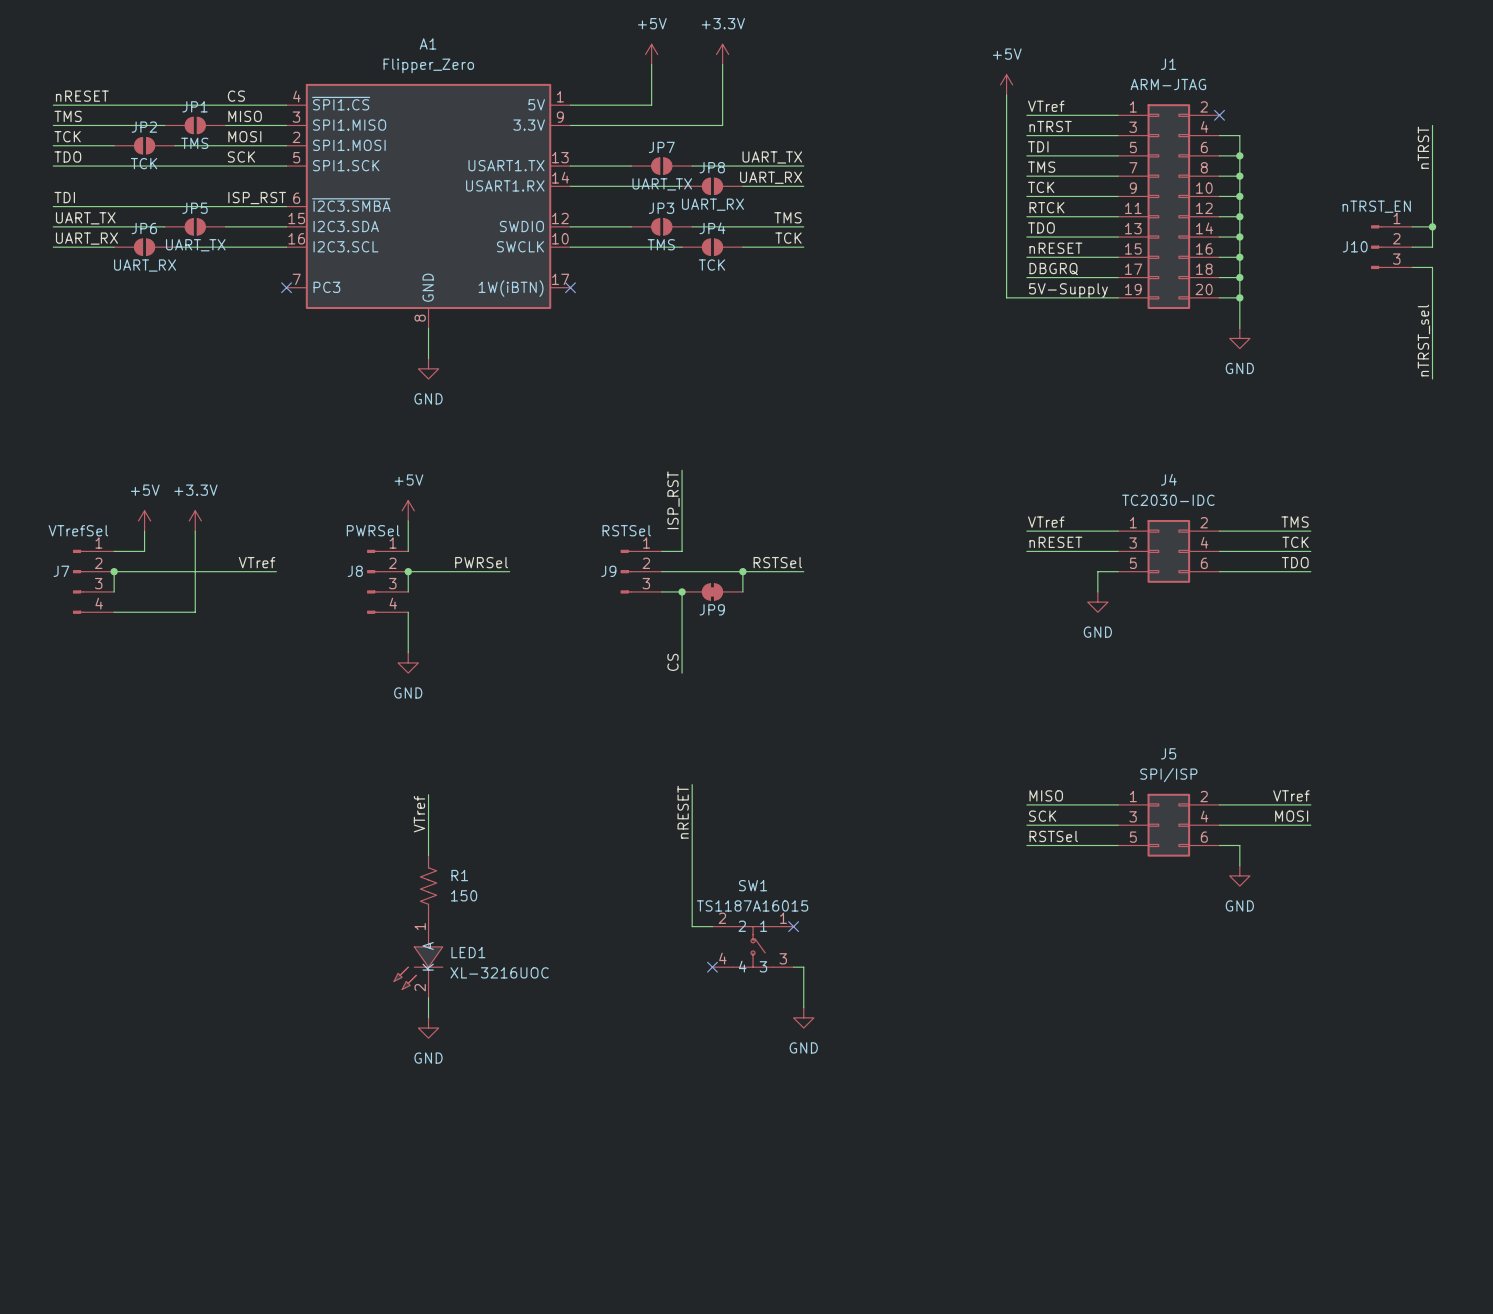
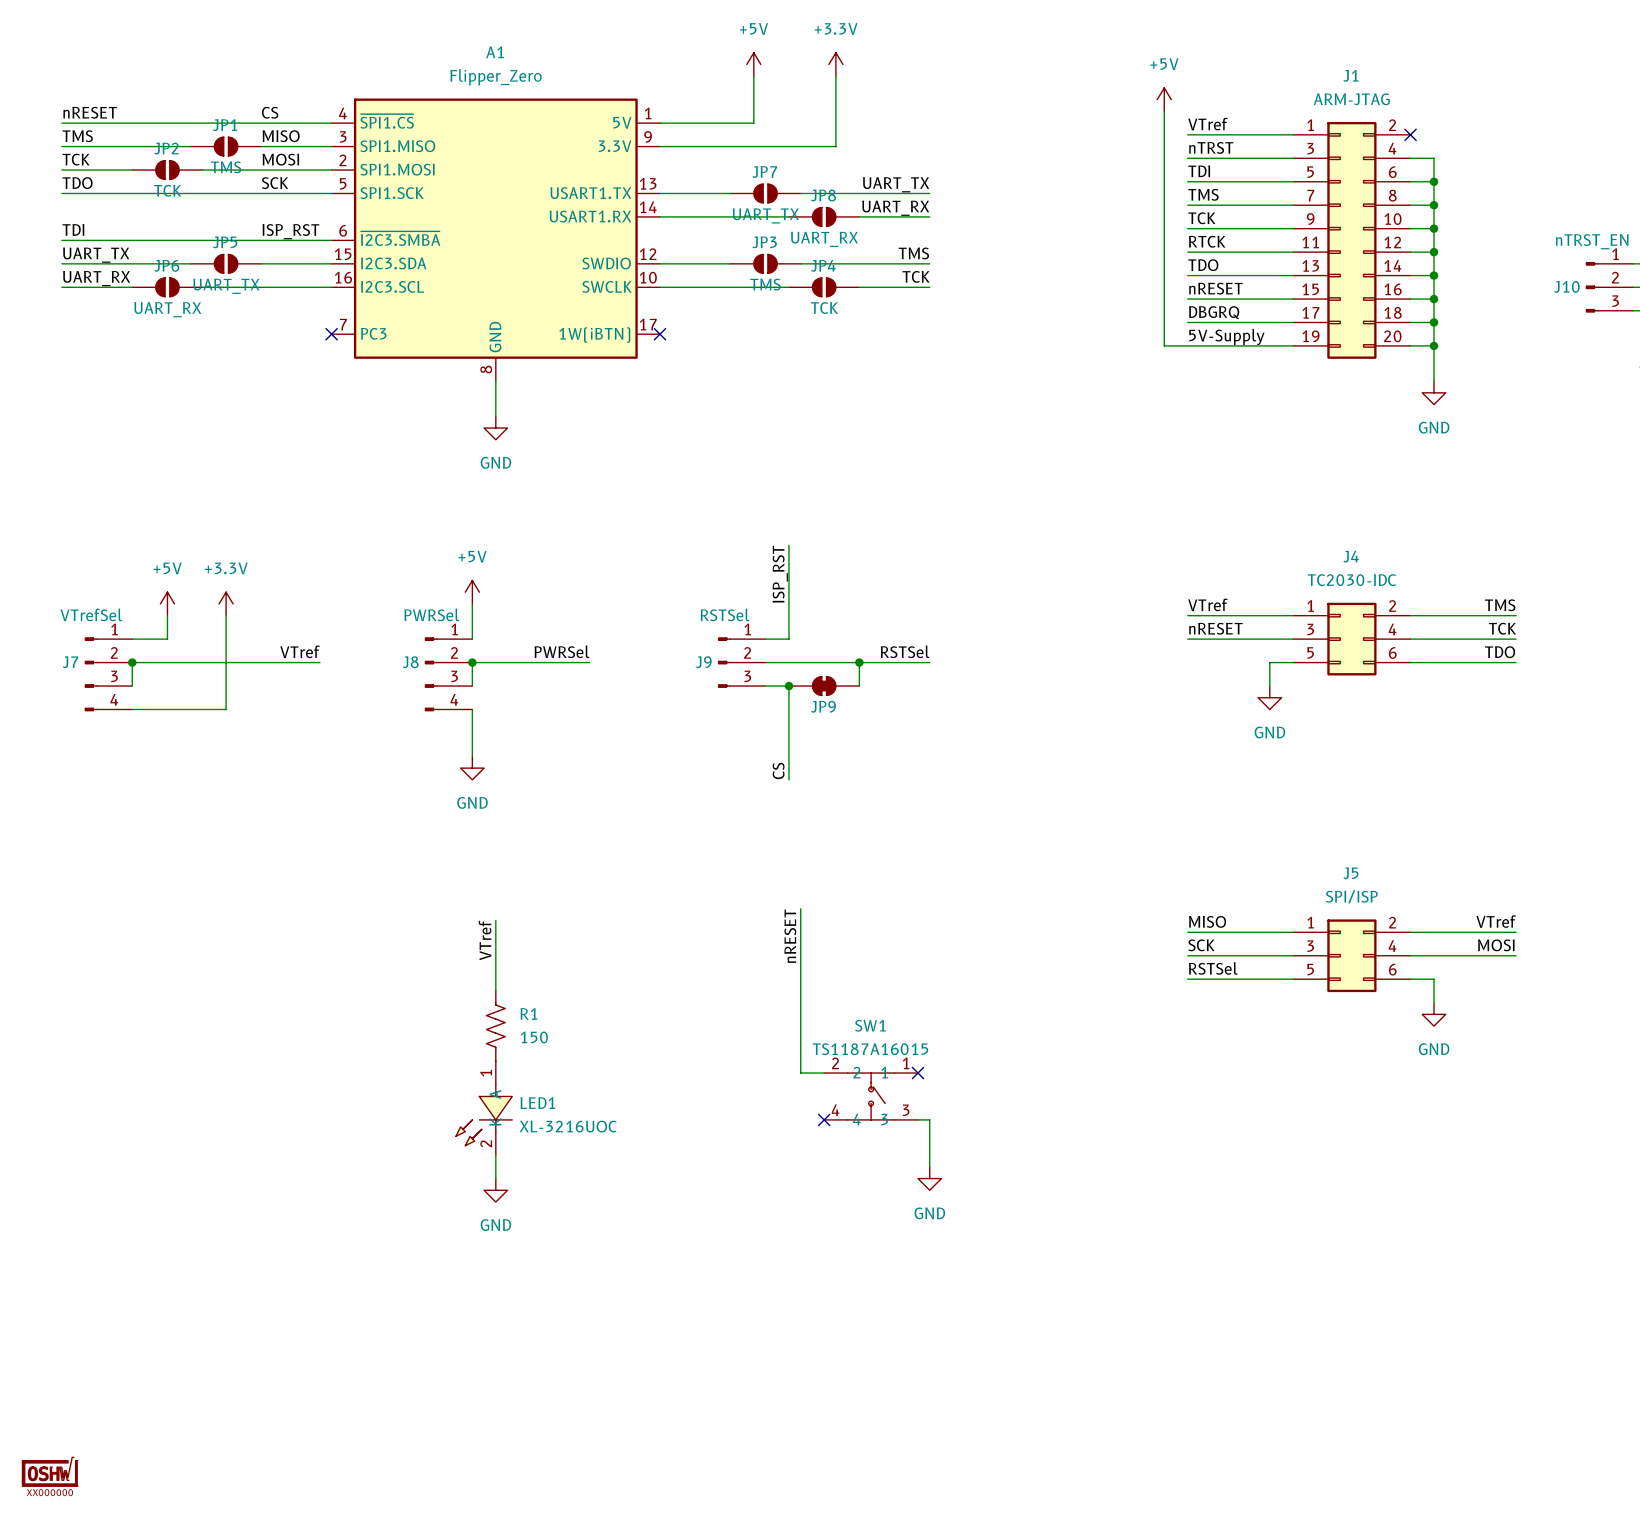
part: none -> (50, 1471)

